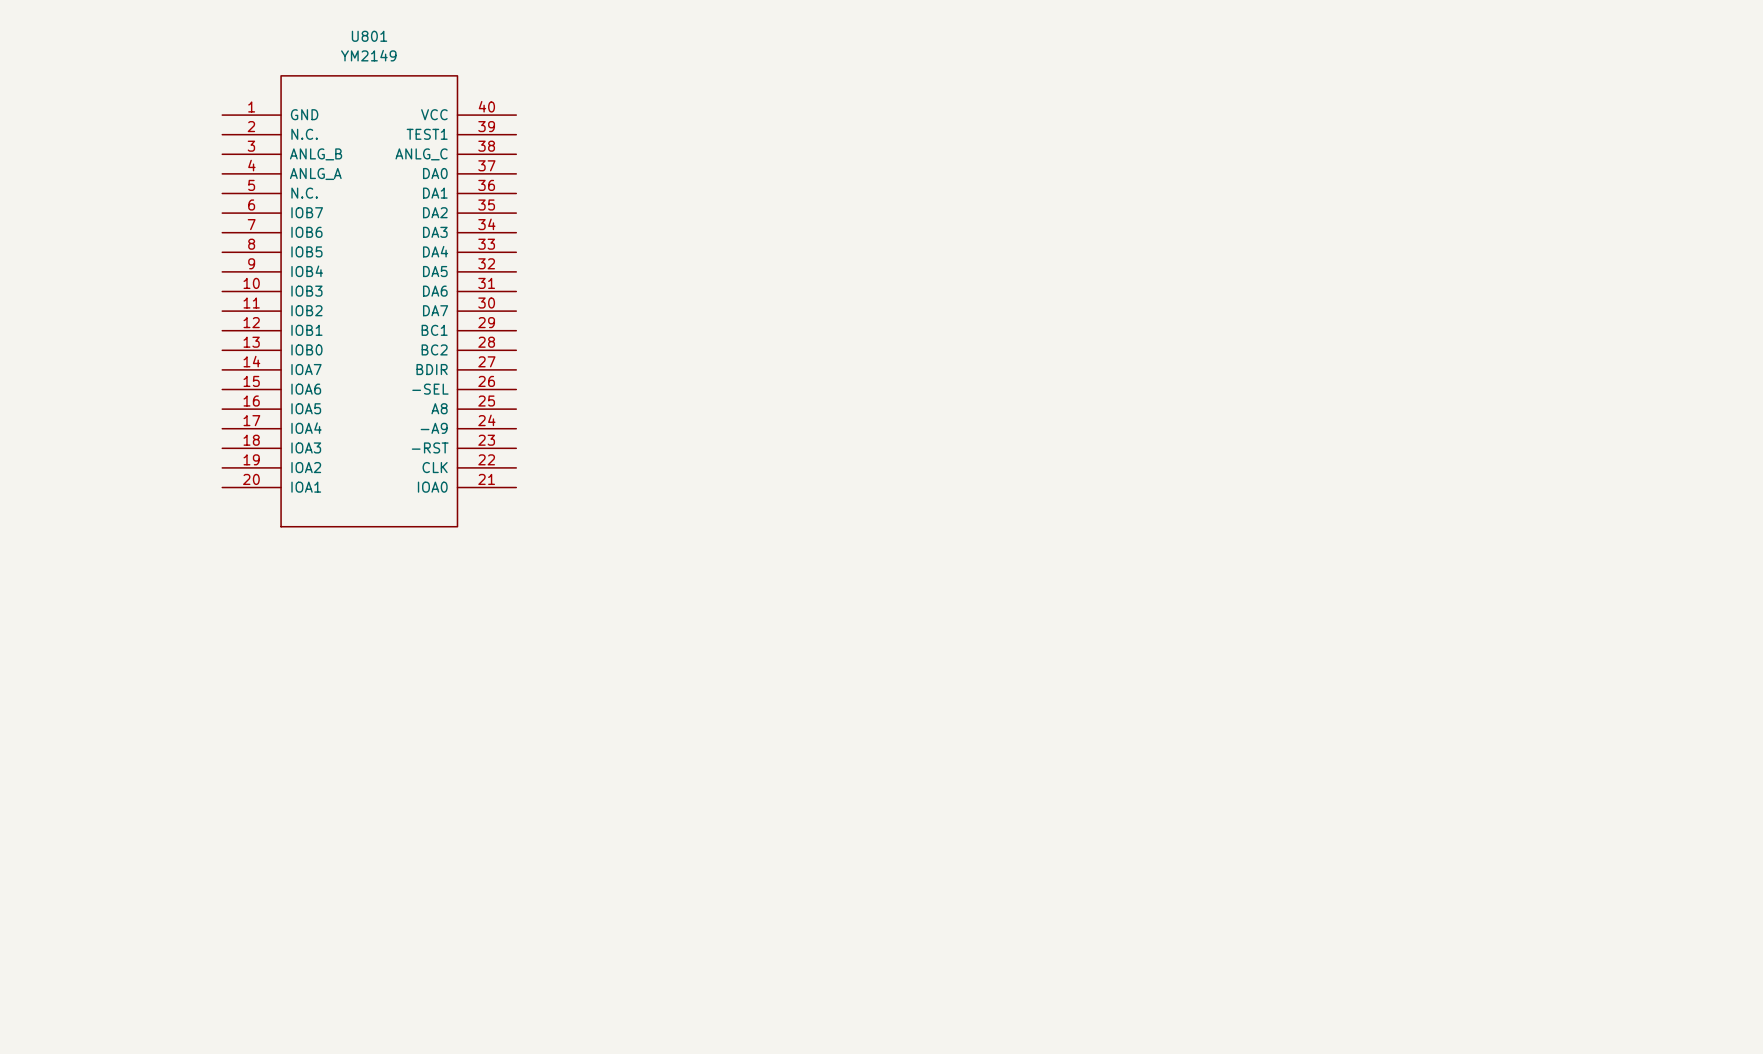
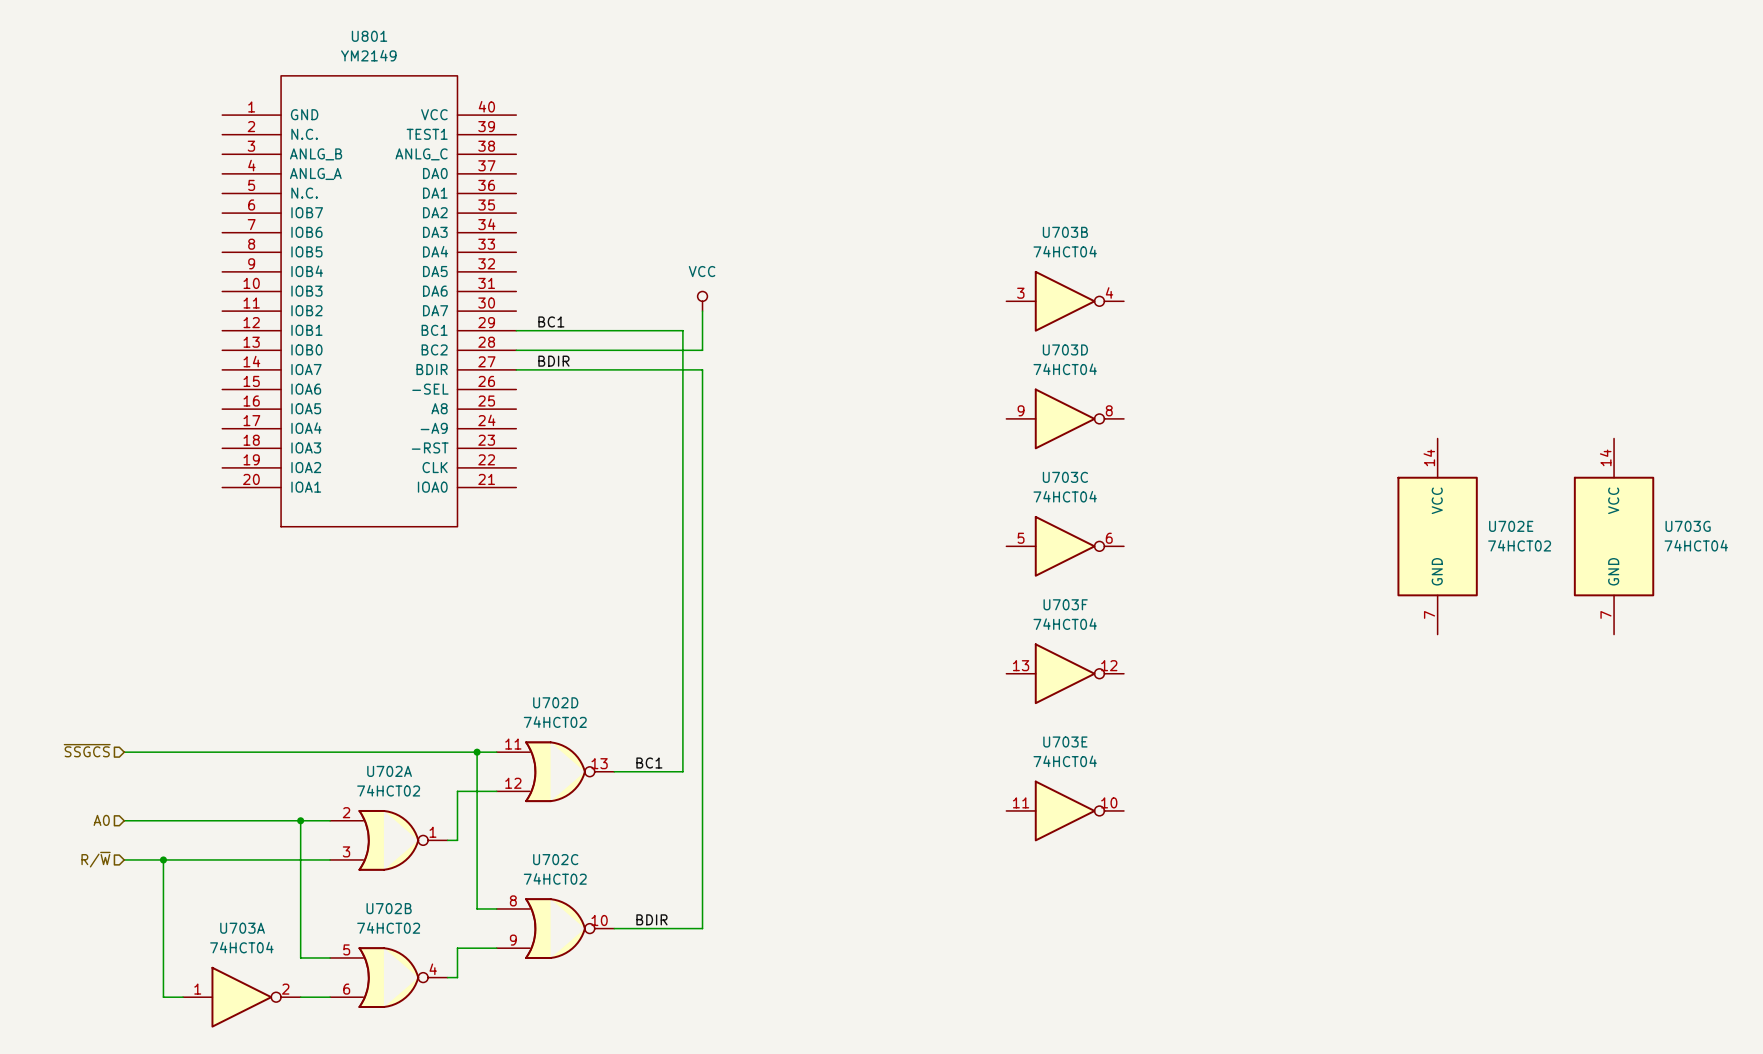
power symbol: none -> VCC (702, 301)
U703B: none -> 74HCT04 (1065, 301)
wire: none -> (702, 311) (702, 350) (516, 350)
label: none -> BC1 (551, 321)
wire: none -> (516, 330) (682, 330) (682, 771) (614, 771)
label: none -> BDIR (553, 361)
wire: none -> (516, 369) (702, 369) (702, 928) (614, 928)
U703D: none -> 74HCT04 (1065, 418)
U702E: none -> 74HCT02 (1437, 536)
U703G: none -> 74HCT04 (1614, 536)
U703C: none -> 74HCT04 (1065, 546)
U703F: none -> 74HCT04 (1065, 673)
hierarchical label: none -> ~{SSGCS} (87, 750)
wire: none -> (124, 752) (496, 752)
wire: none -> (477, 752) (477, 908) (496, 908)
junction: none -> (477, 752)
label: none -> BC1 (649, 763)
U702D: none -> 74HCT02 (555, 771)
wire: none -> (496, 791) (457, 791) (457, 840) (447, 840)
U703E: none -> 74HCT04 (1065, 810)
hierarchical label: none -> A0 (101, 820)
wire: none -> (124, 820) (330, 820)
wire: none -> (300, 820) (300, 957) (330, 957)
junction: none -> (300, 820)
U702A: none -> 74HCT02 (388, 840)
hierarchical label: none -> R/~{W} (96, 859)
wire: none -> (124, 859) (330, 859)
wire: none -> (163, 859) (163, 997) (183, 997)
junction: none -> (163, 859)
label: none -> BDIR (651, 919)
U702C: none -> 74HCT02 (555, 928)
wire: none -> (496, 948) (457, 948) (457, 977) (447, 977)
U702B: none -> 74HCT02 (388, 977)
U703A: none -> 74HCT04 (241, 997)
wire: none -> (300, 997) (330, 997)

